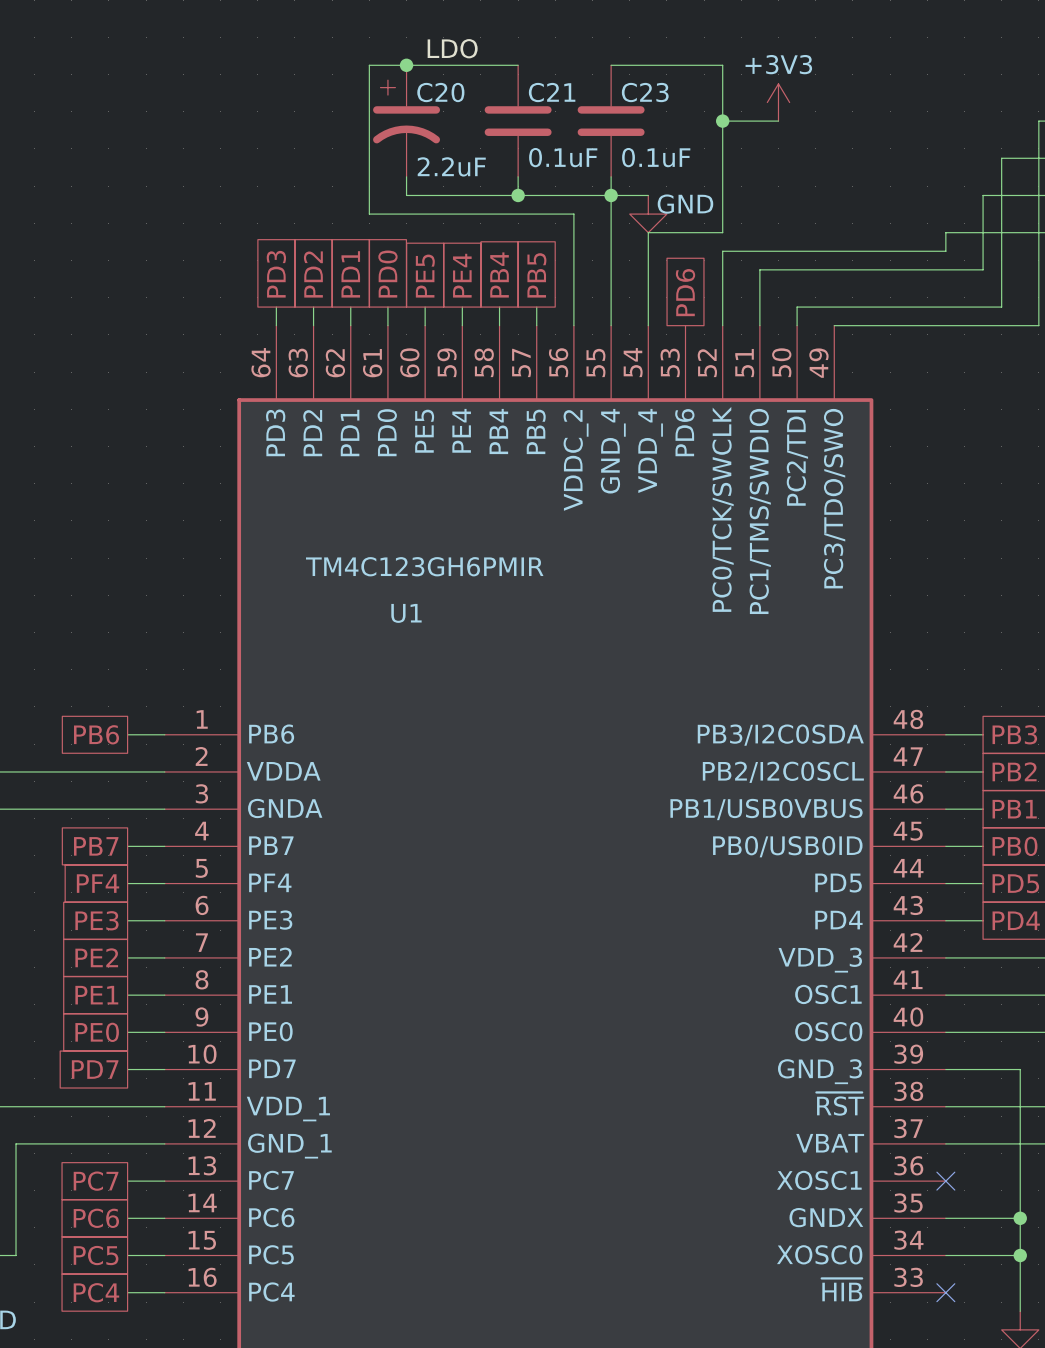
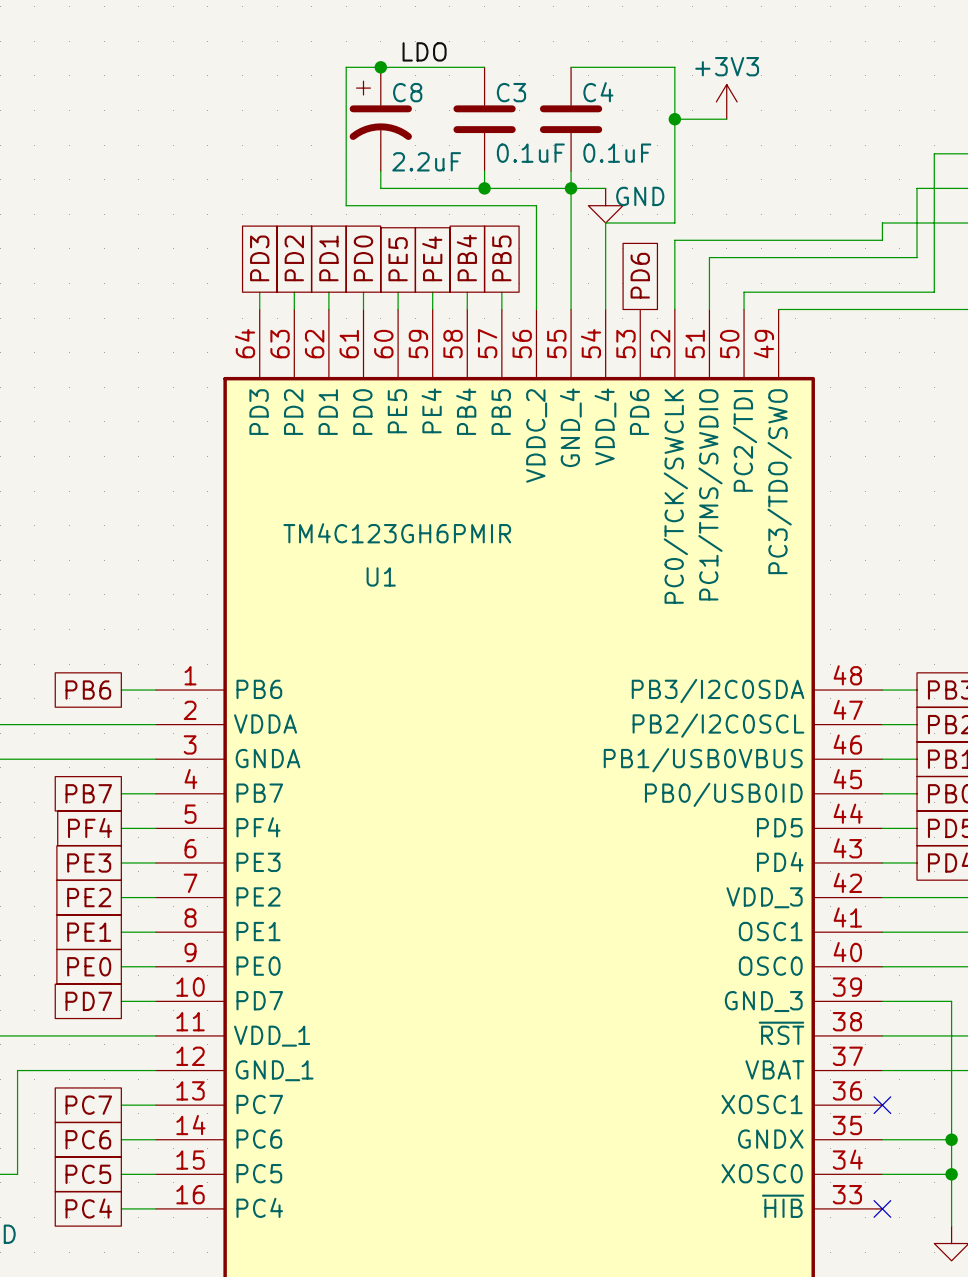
C20 name: C20 (440, 92) -> C8 (407, 92)
C21 name: C21 (552, 92) -> C3 (511, 92)
C23 name: C23 (645, 92) -> C4 (598, 92)

